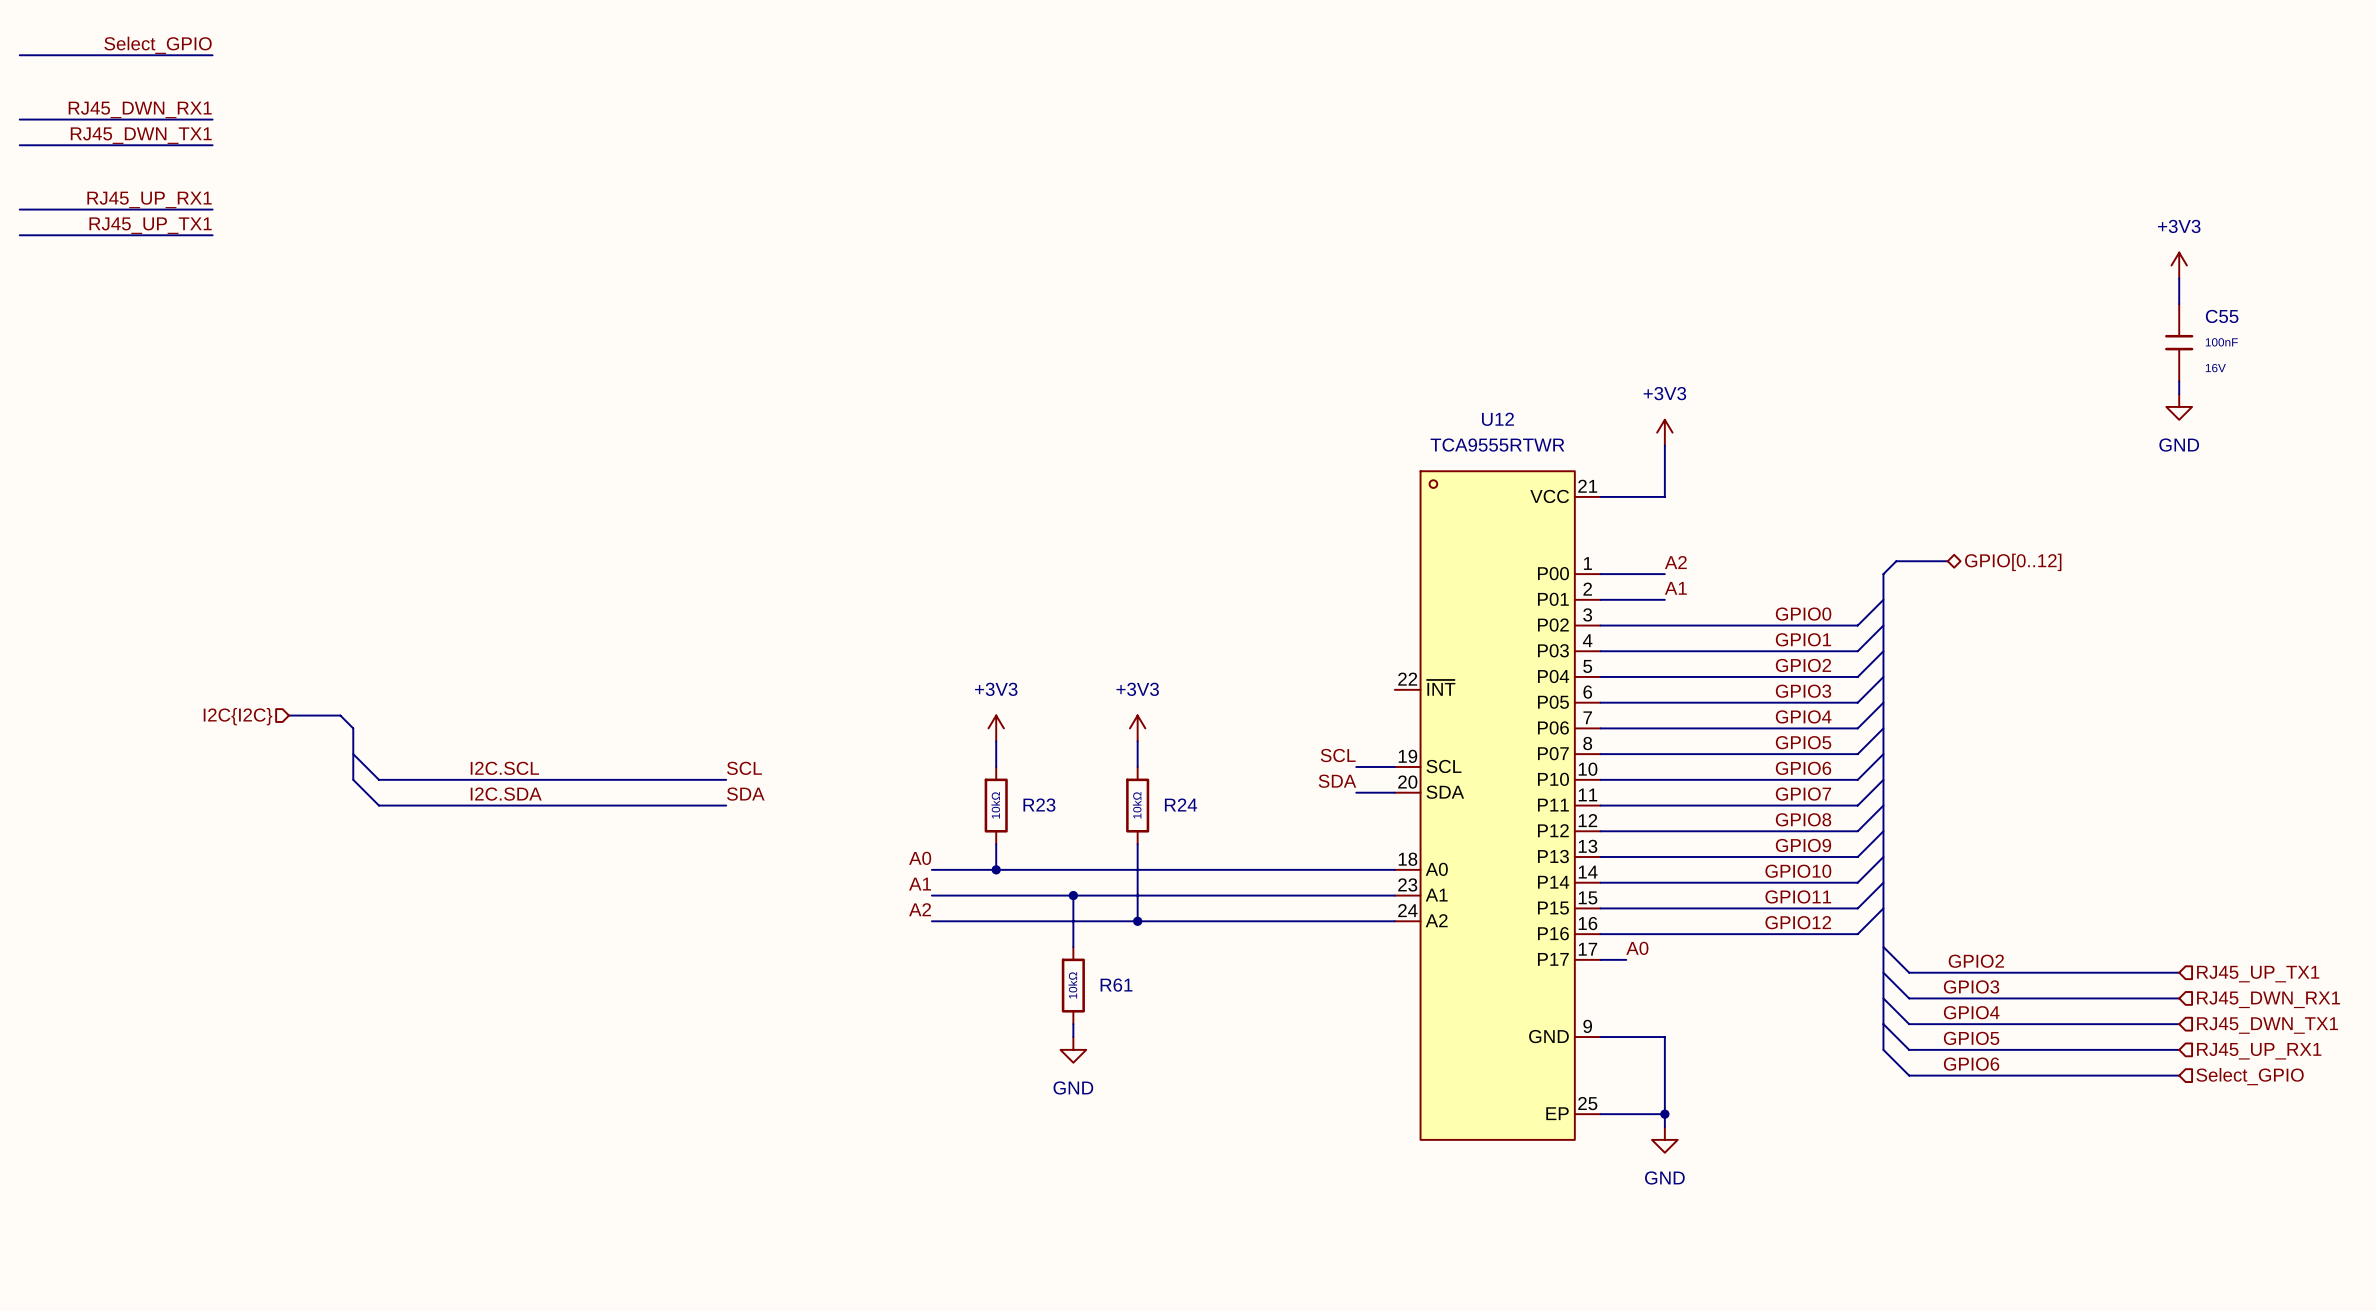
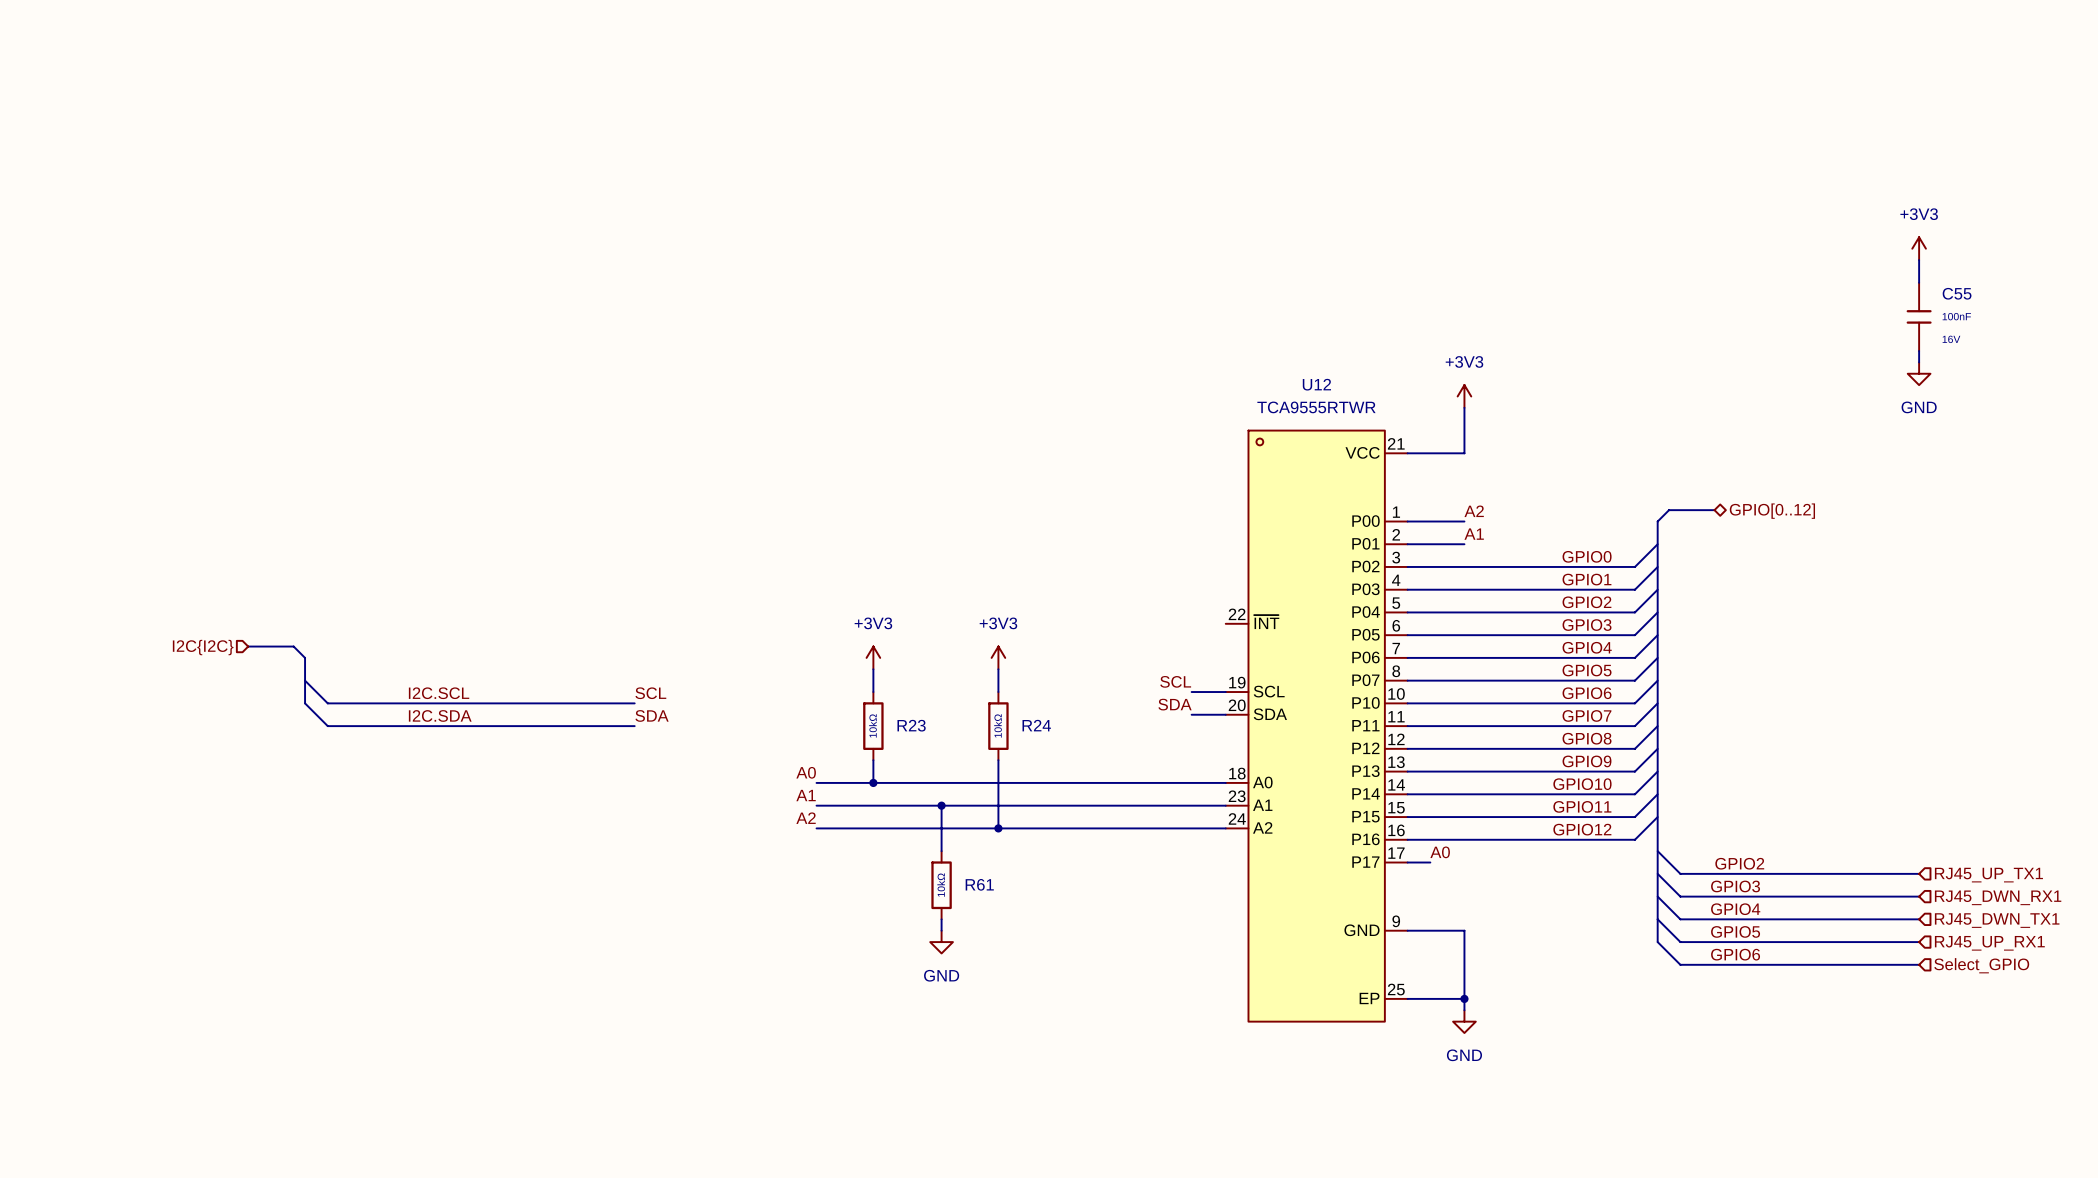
label: Select_GPIO (158, 45) -> none
wire: (19, 55) (212, 55) -> none
label: RJ45_DWN_RX1 (140, 109) -> none
wire: (19, 119) (212, 119) -> none
label: RJ45_DWN_TX1 (141, 135) -> none
wire: (19, 145) (212, 145) -> none
label: RJ45_UP_RX1 (149, 199) -> none
wire: (19, 209) (212, 209) -> none
label: RJ45_UP_TX1 (150, 225) -> none
wire: (19, 235) (212, 235) -> none

